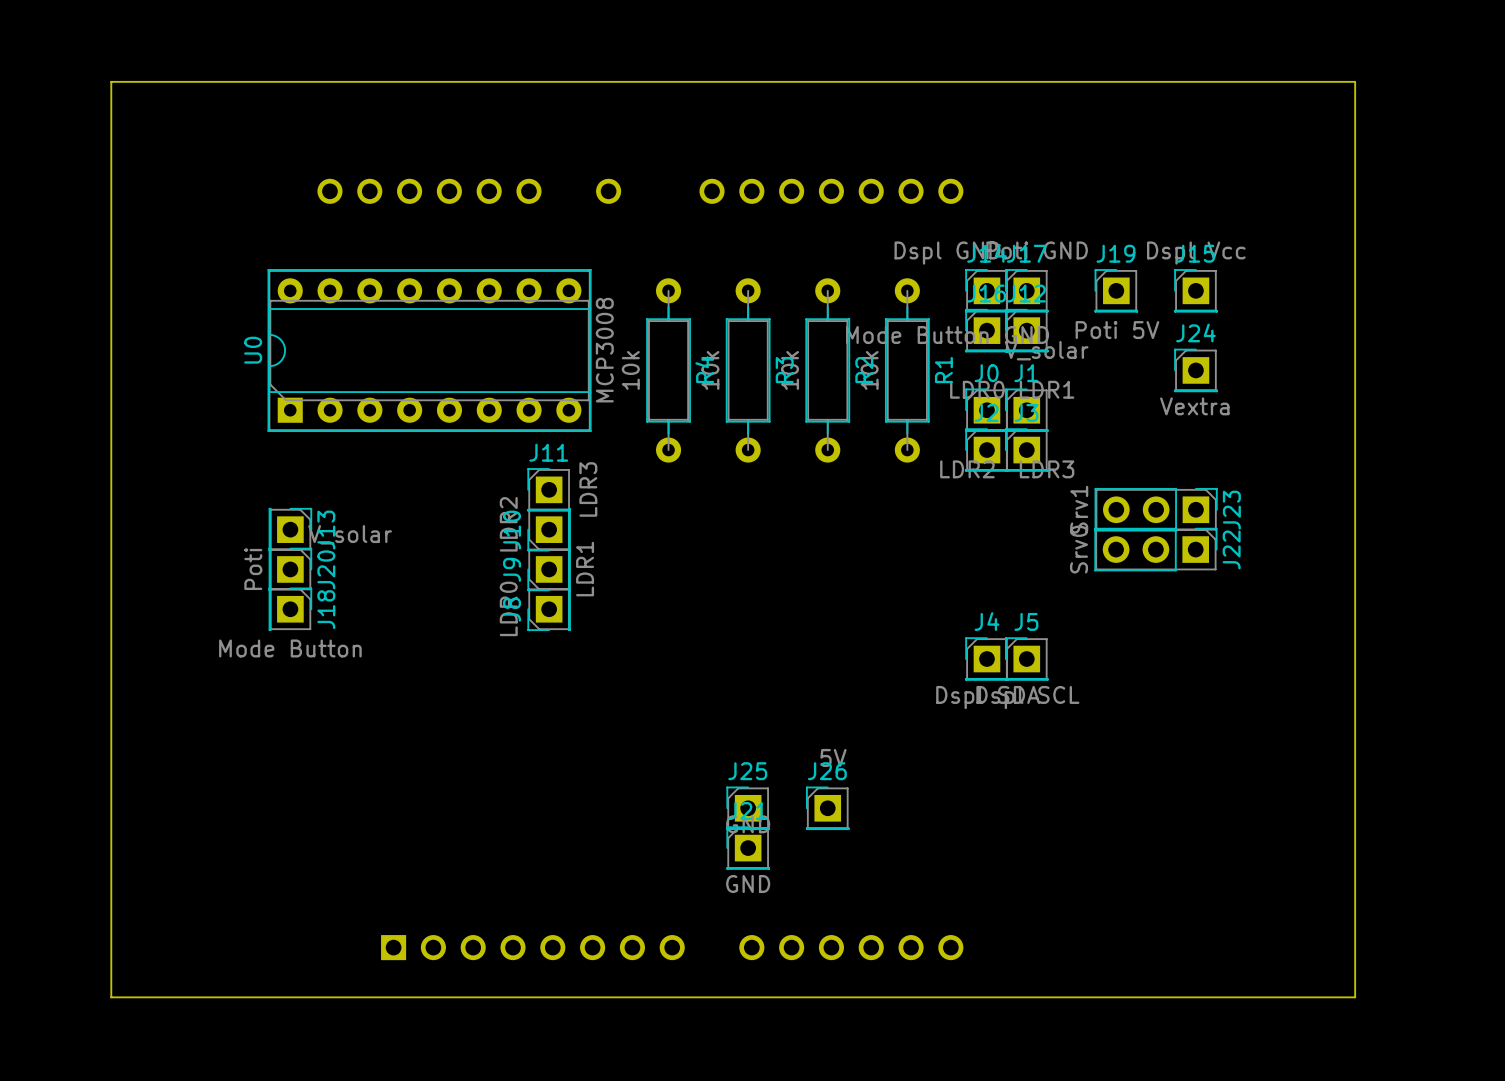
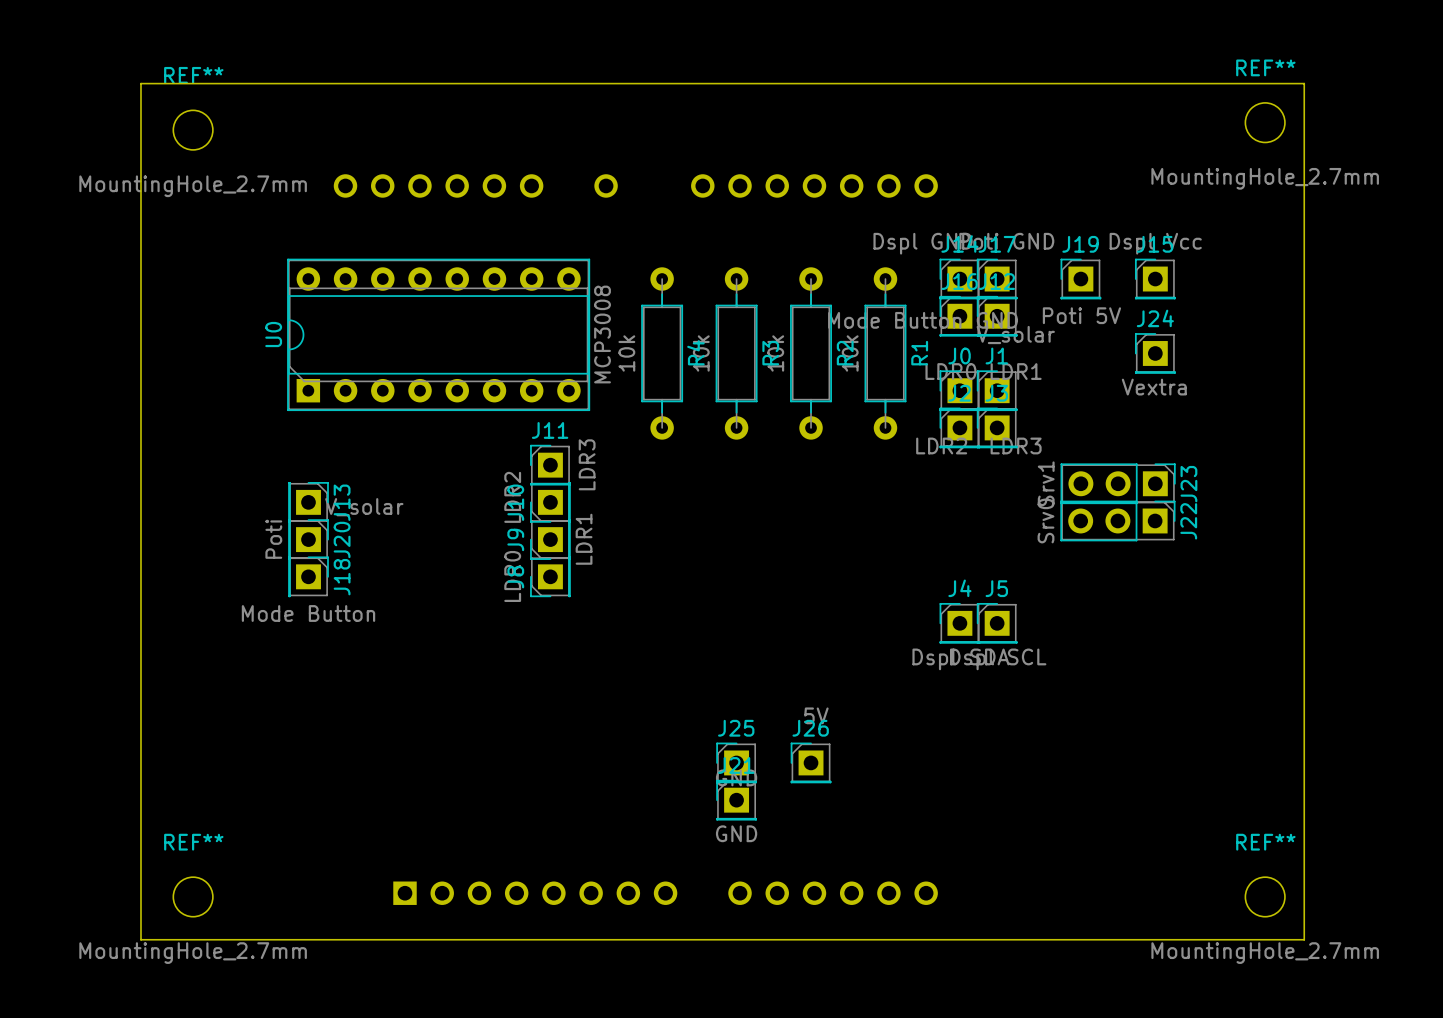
REF**: none -> MountingHole_2.7mm (1265, 122)
REF**: none -> MountingHole_2.7mm (193, 130)
REF**: none -> MountingHole_2.7mm (193, 896)
REF**: none -> MountingHole_2.7mm (1265, 896)

